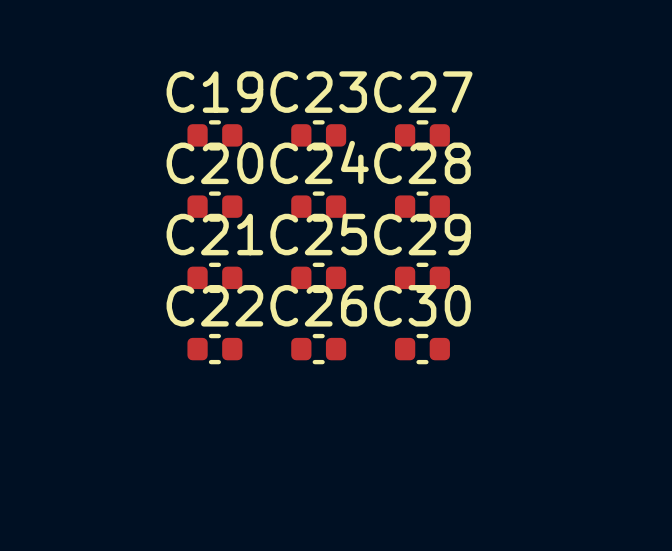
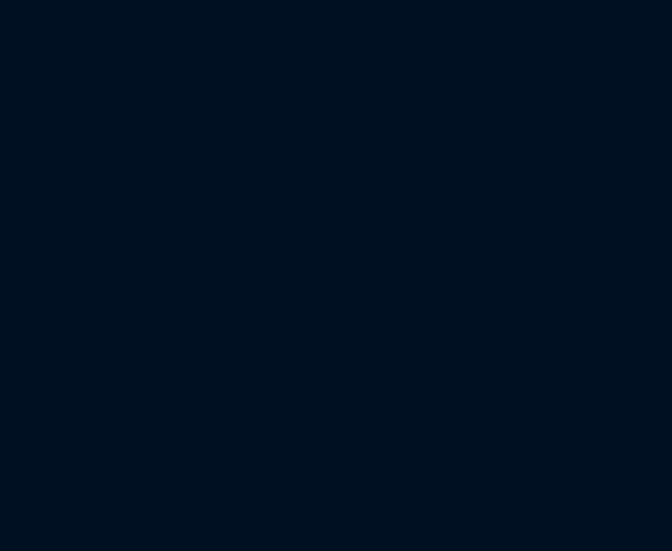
C19: (214, 135) -> none
C23: (318, 135) -> none
C27: (422, 135) -> none
C20: (214, 206) -> none
C24: (318, 206) -> none
C28: (422, 206) -> none
C21: (214, 277) -> none
C25: (318, 277) -> none
C29: (422, 277) -> none
C22: (214, 349) -> none
C26: (318, 349) -> none
C30: (422, 349) -> none

